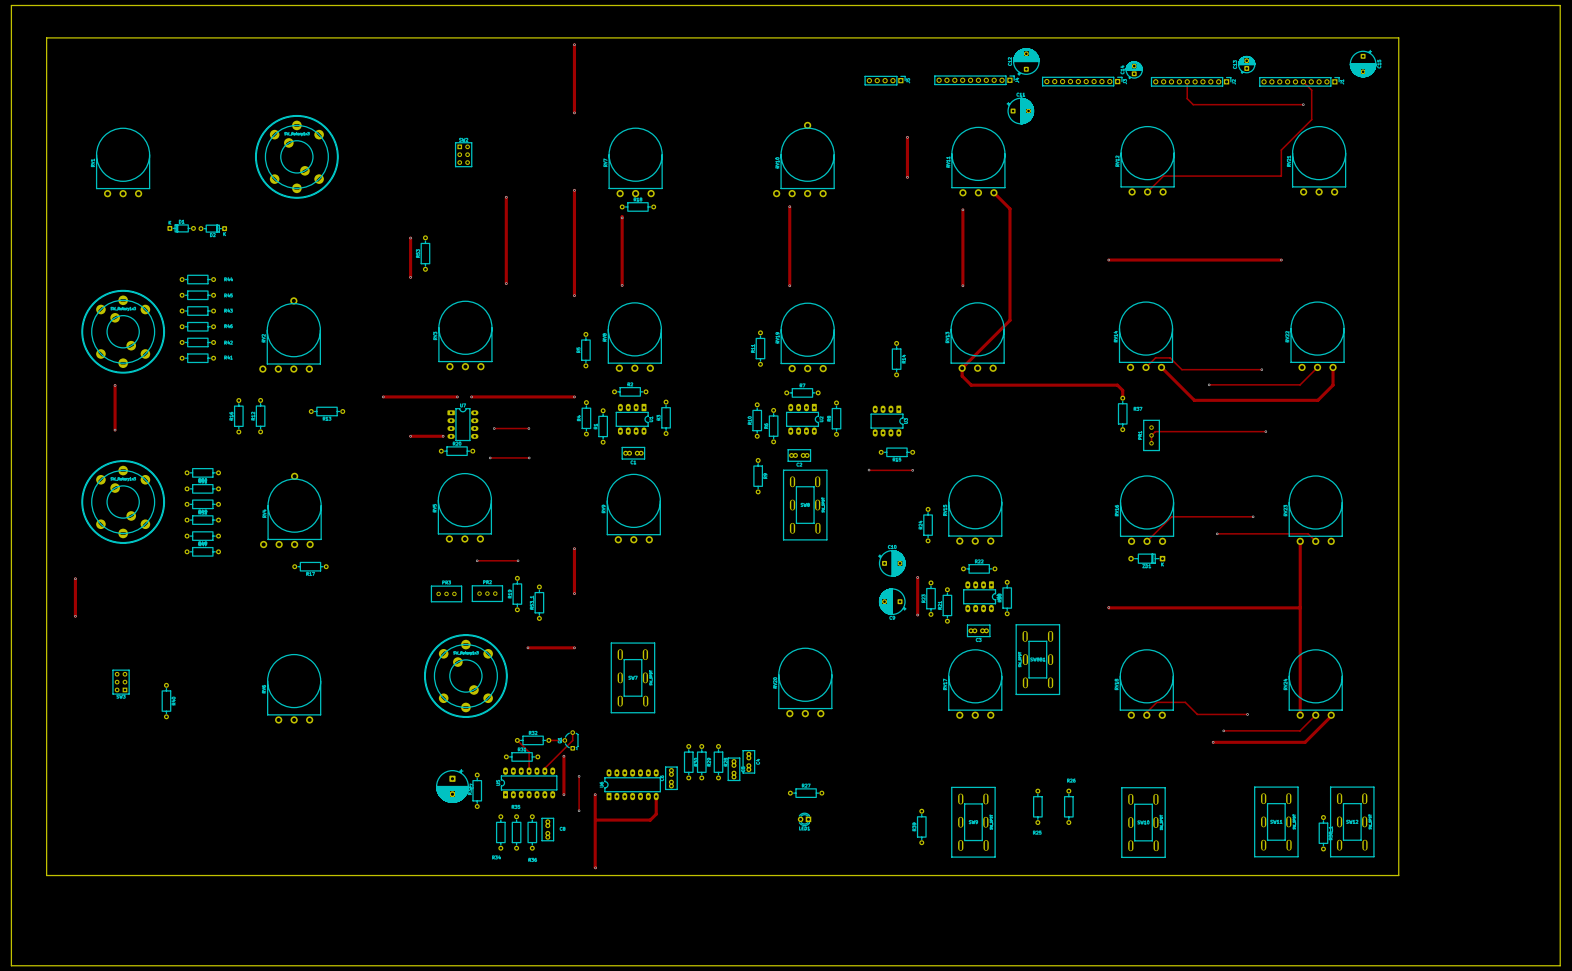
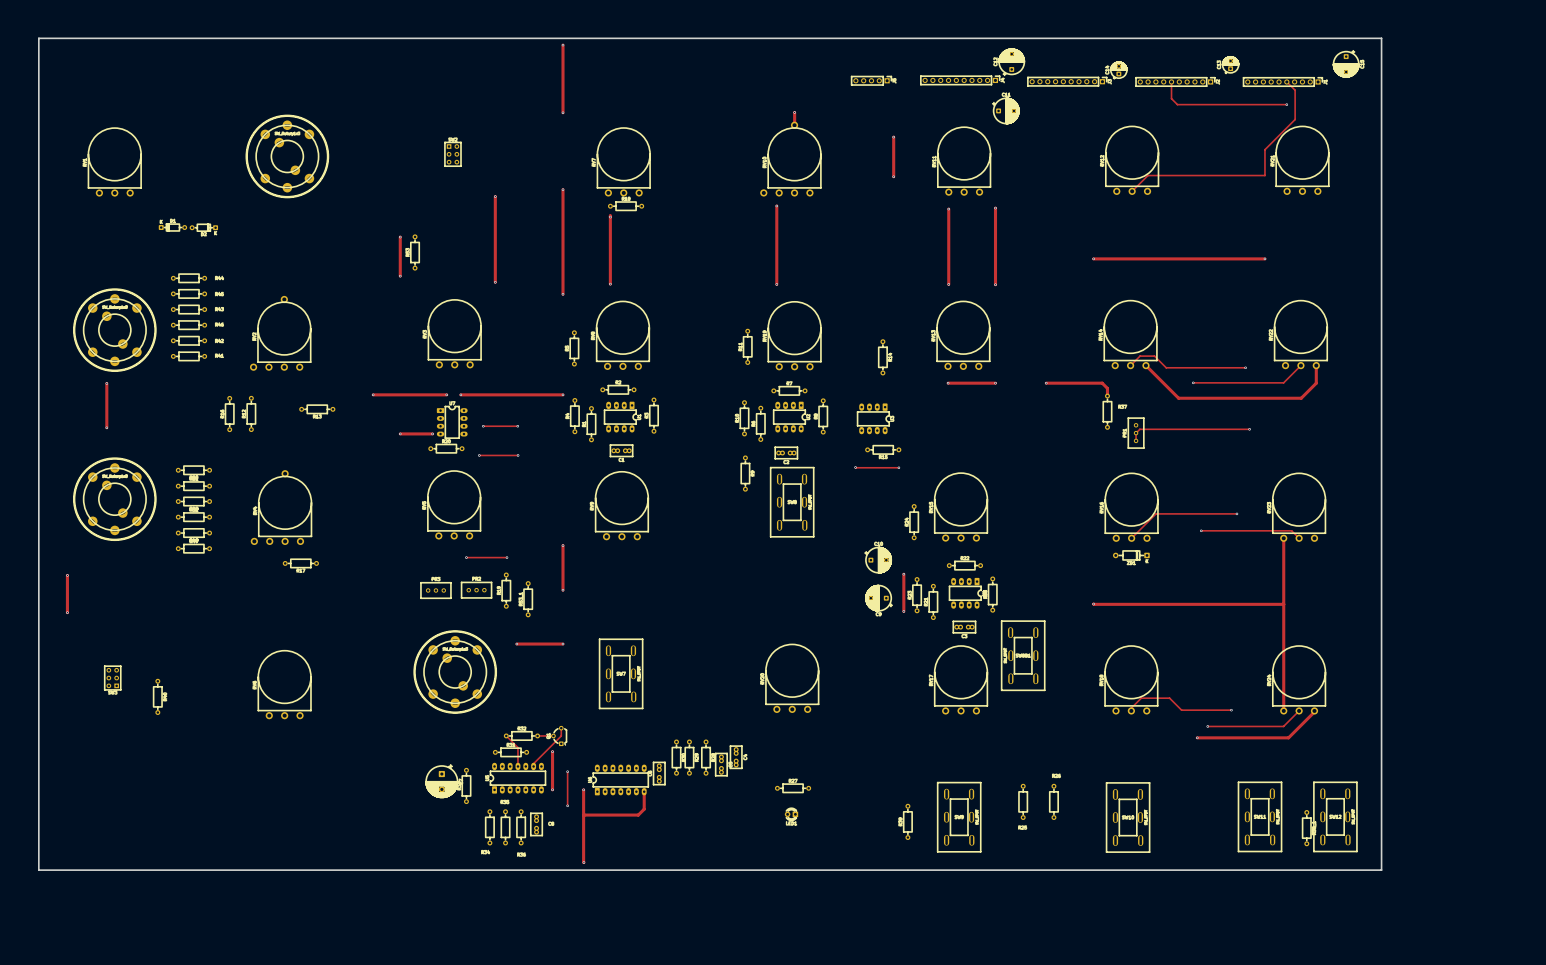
board edge: (11, 5) (1560, 5) (1560, 965) (11, 965) (11, 5) -> none
track: none -> (794, 112) (794, 125)
via: none -> (794, 112)
track: (993, 192) (1009, 208) -> none
via: none -> (995, 208)
track: (1009, 286) (1009, 320) (962, 368) (962, 376) (971, 385) -> (948, 383) (957, 383)
via: none -> (995, 284)
via: none -> (948, 383)
track: (1009, 385) (1061, 385) -> none
via: none -> (995, 383)
via: none -> (1046, 383)

